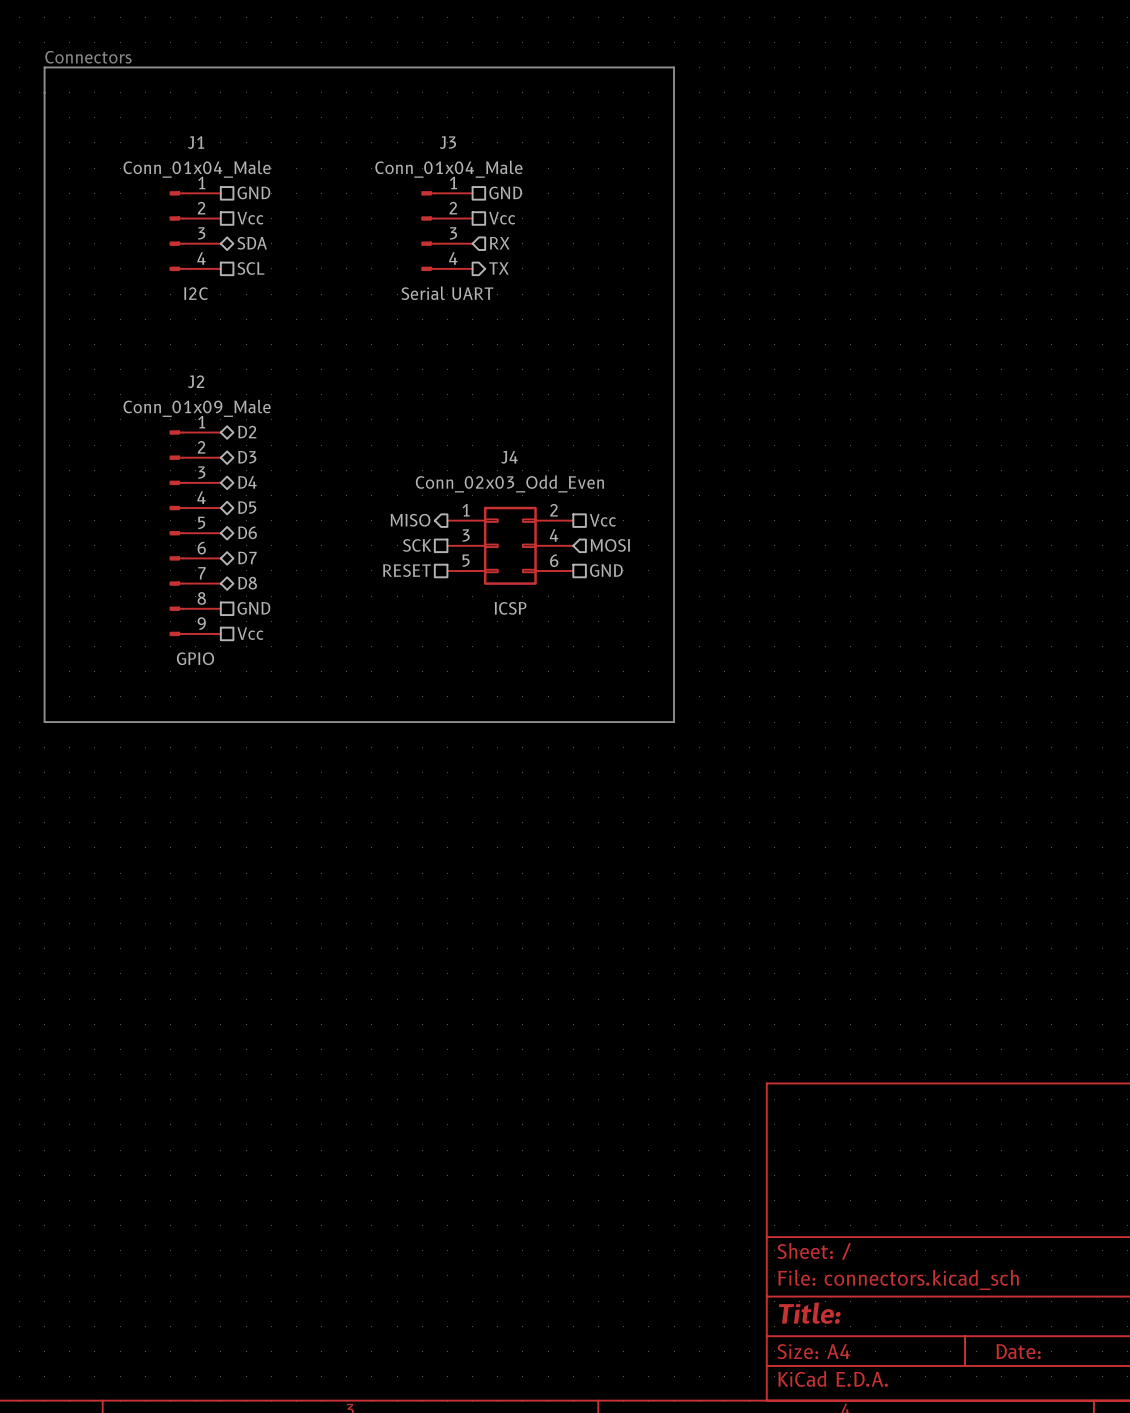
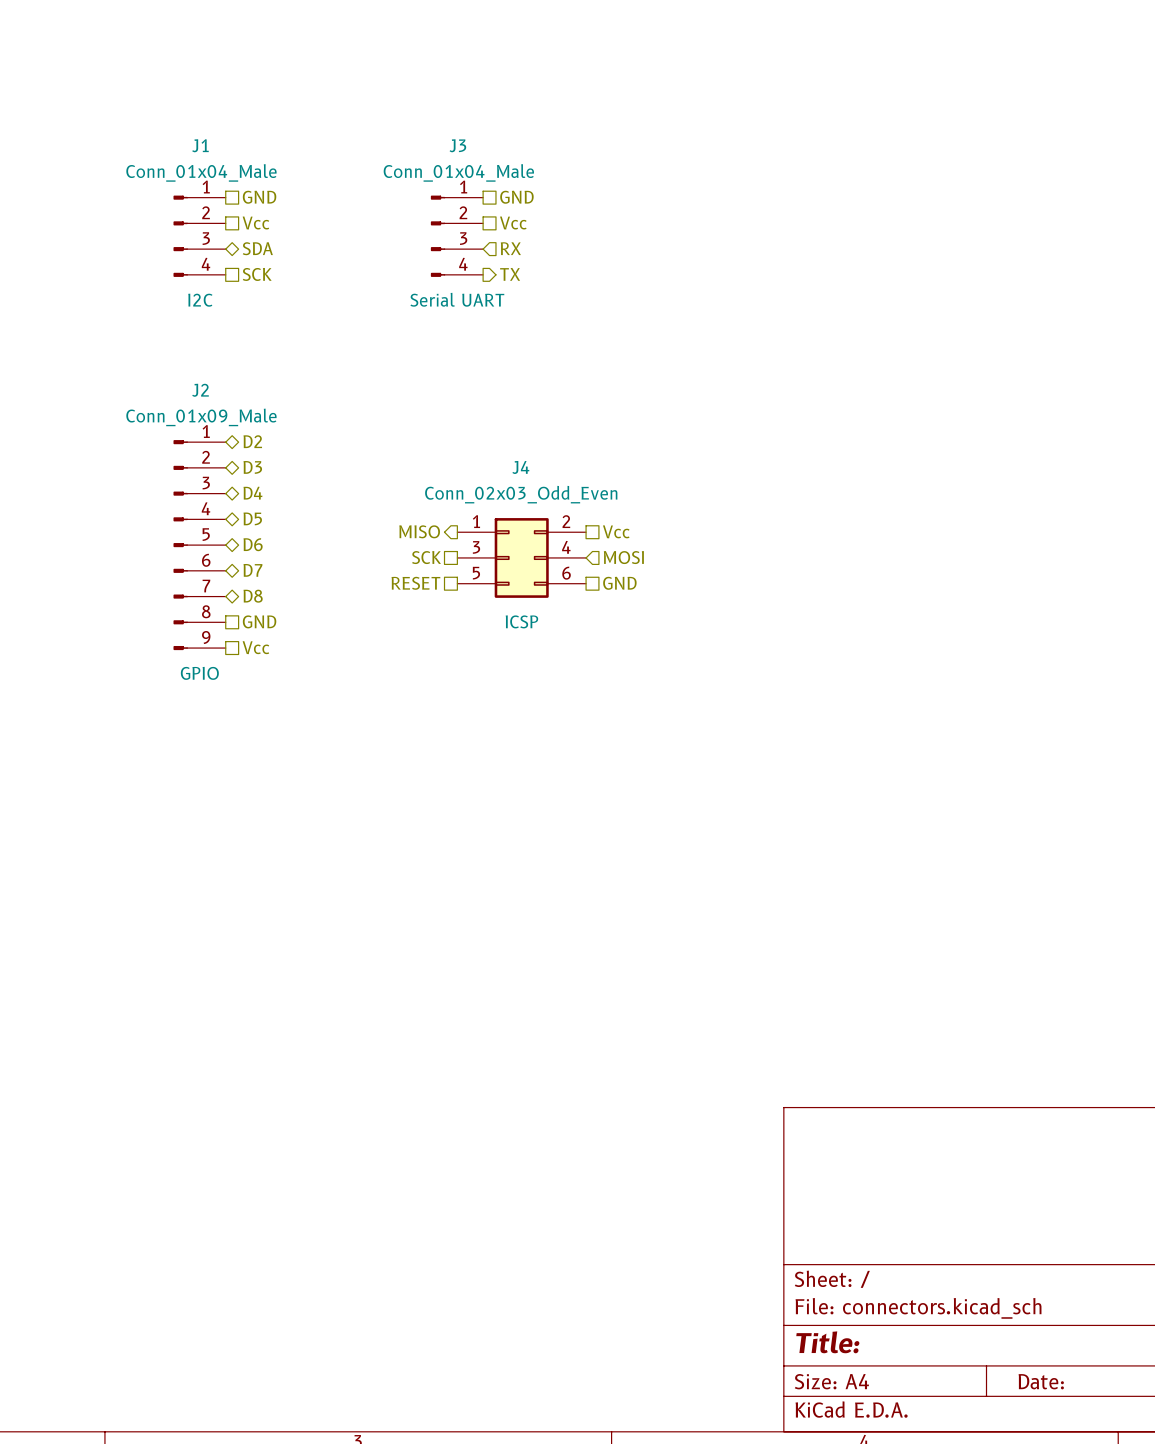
text: Connectors (88, 57) -> none
line: (44, 67) (44, 722) (674, 722) (674, 67) (44, 67) -> none
hierarchical label: SCL (250, 268) -> SCK (257, 274)

